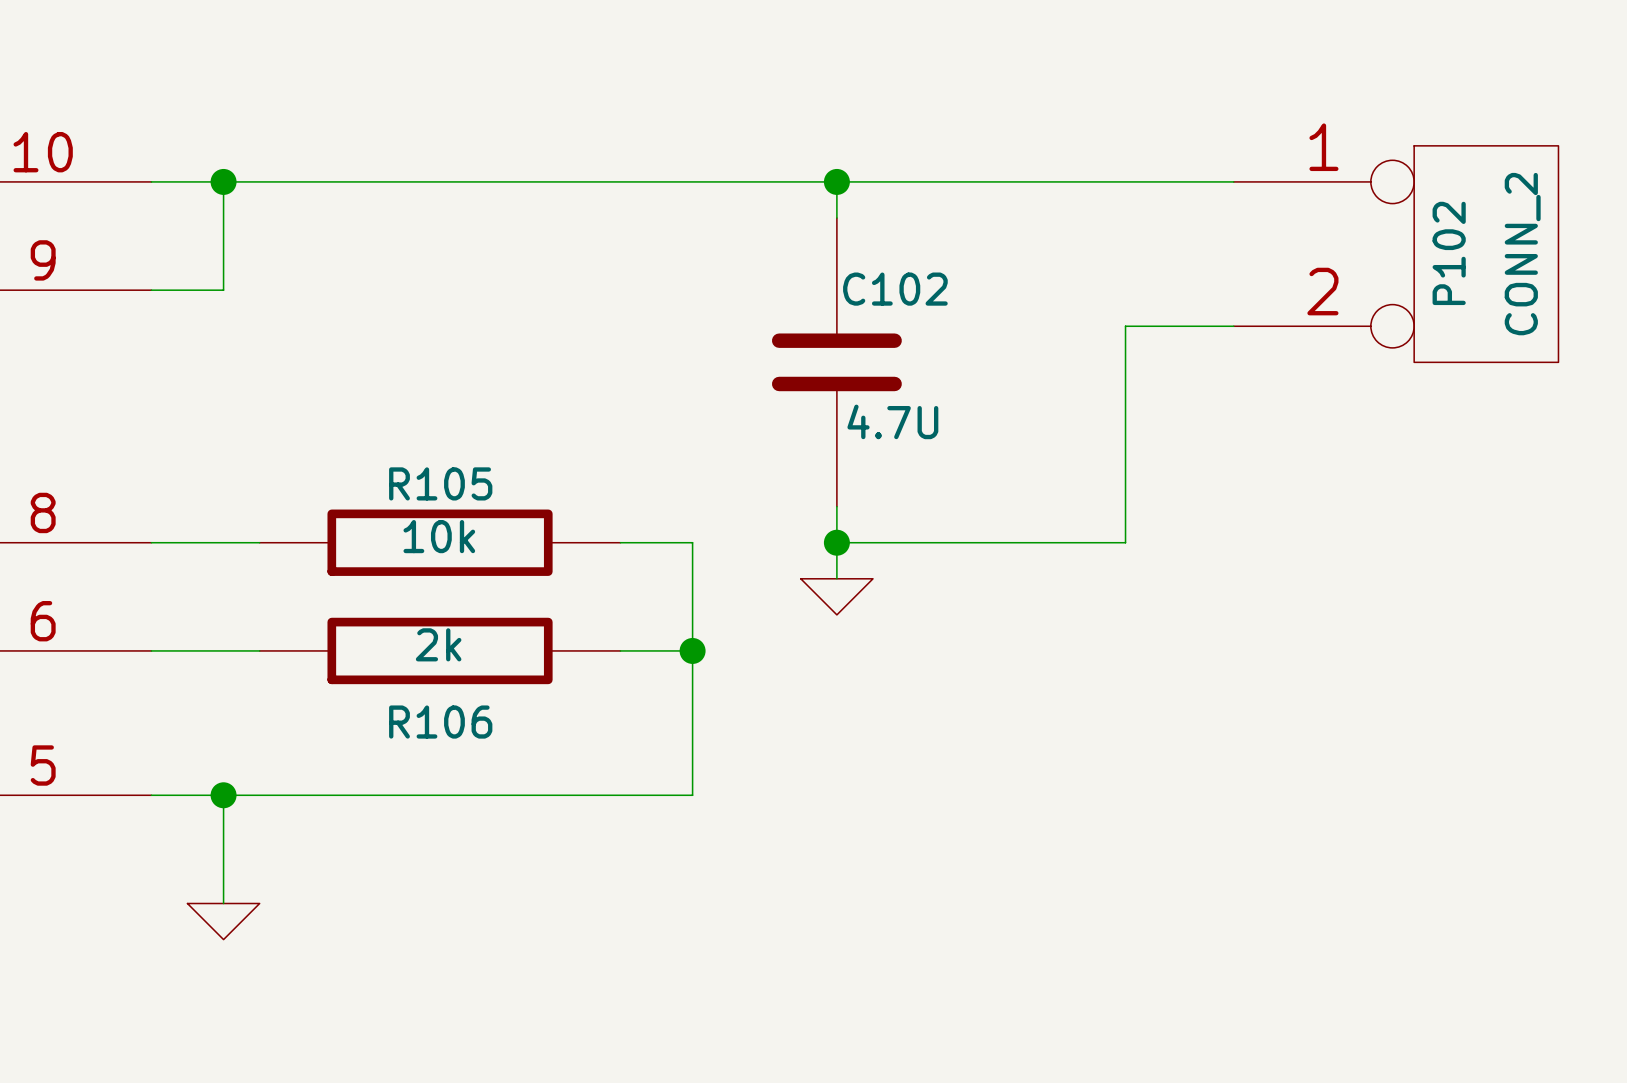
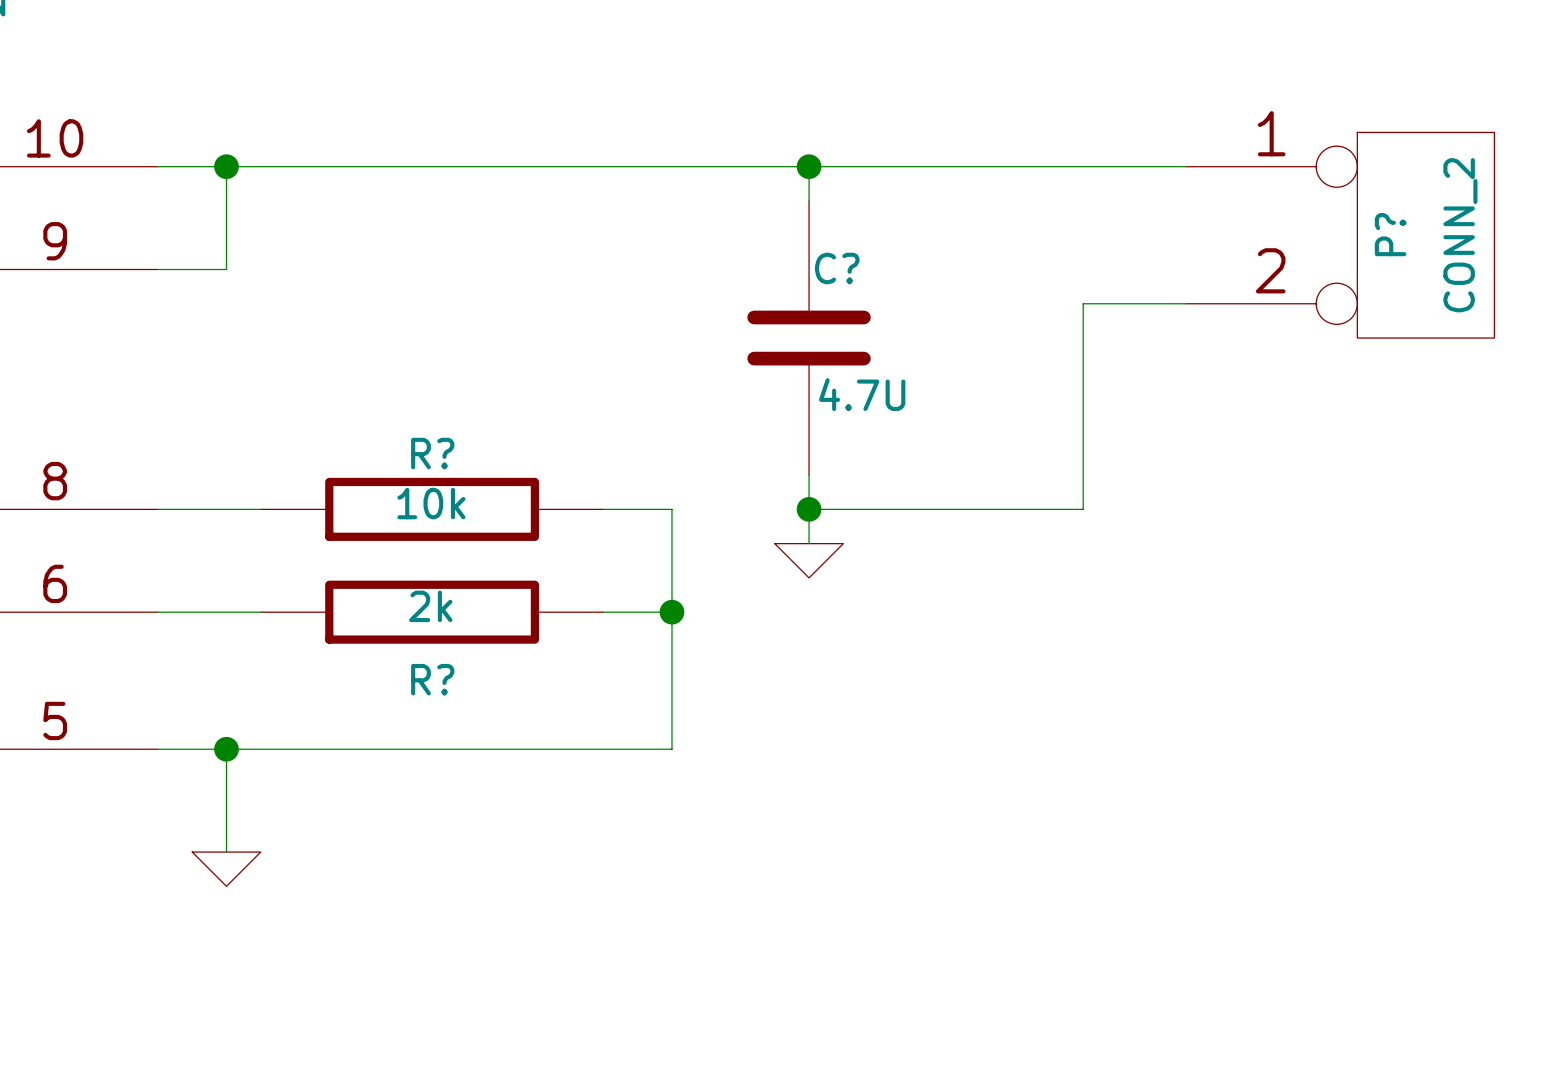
P102 name: P102 (1449, 253) -> P? (1390, 234)
C102 name: C102 (895, 289) -> C? (837, 268)
R105 name: R105 (440, 483) -> R? (432, 453)
R106 name: R106 (440, 722) -> R? (432, 679)

